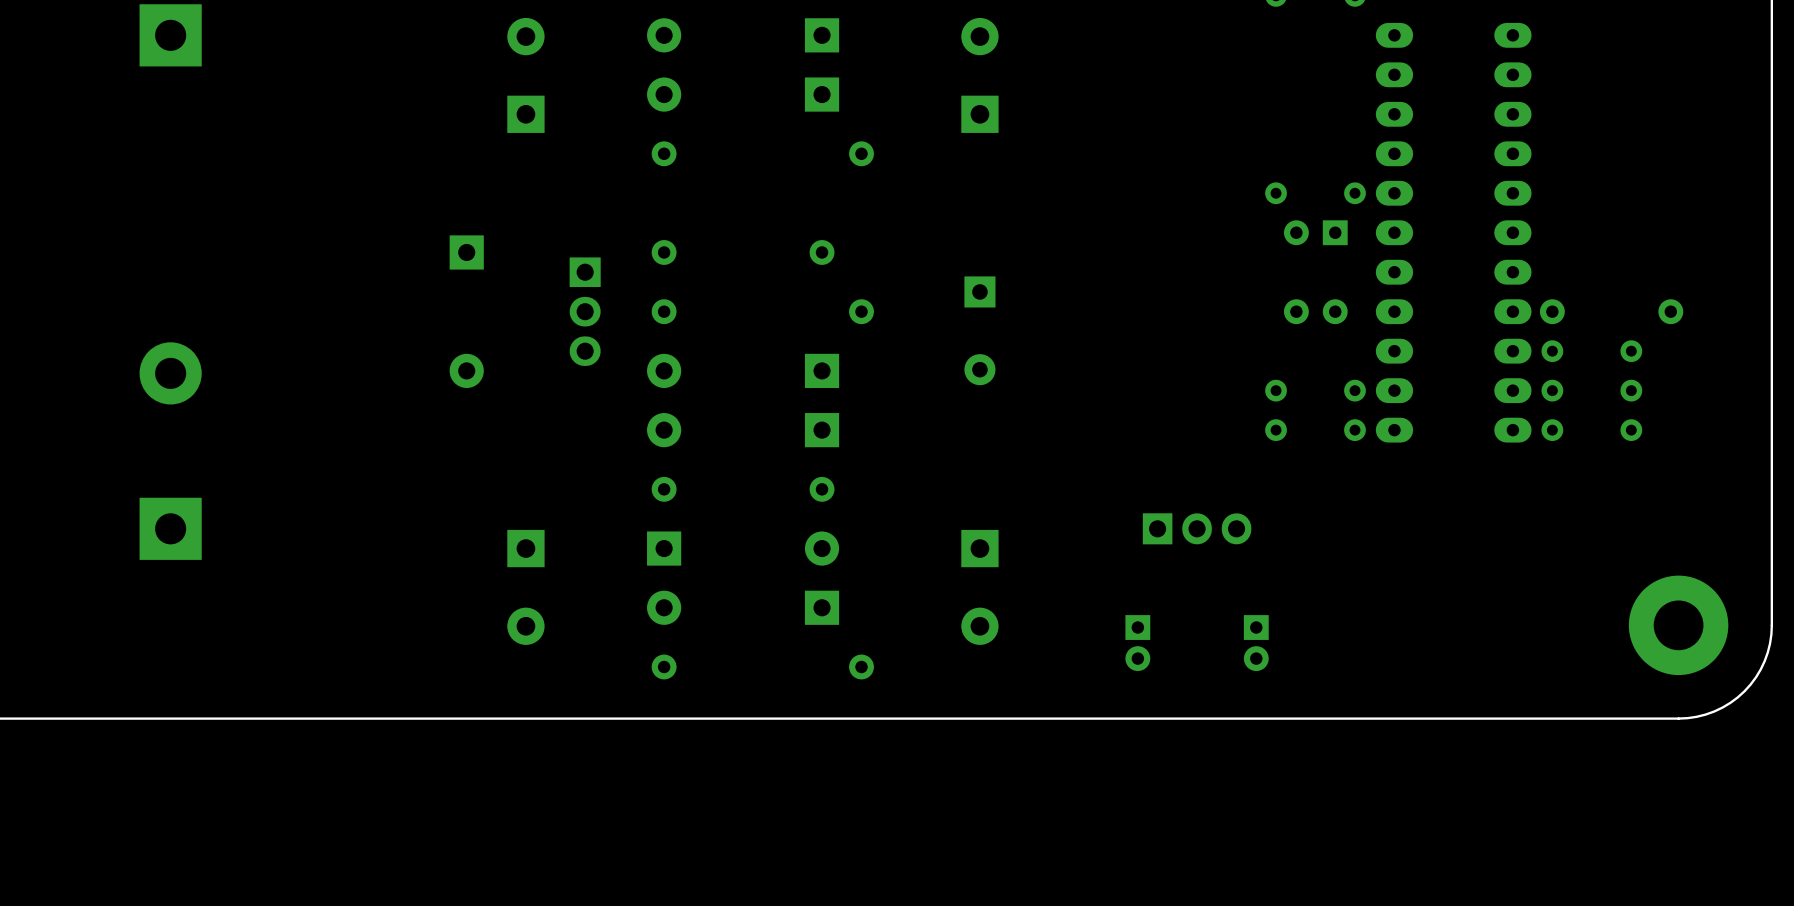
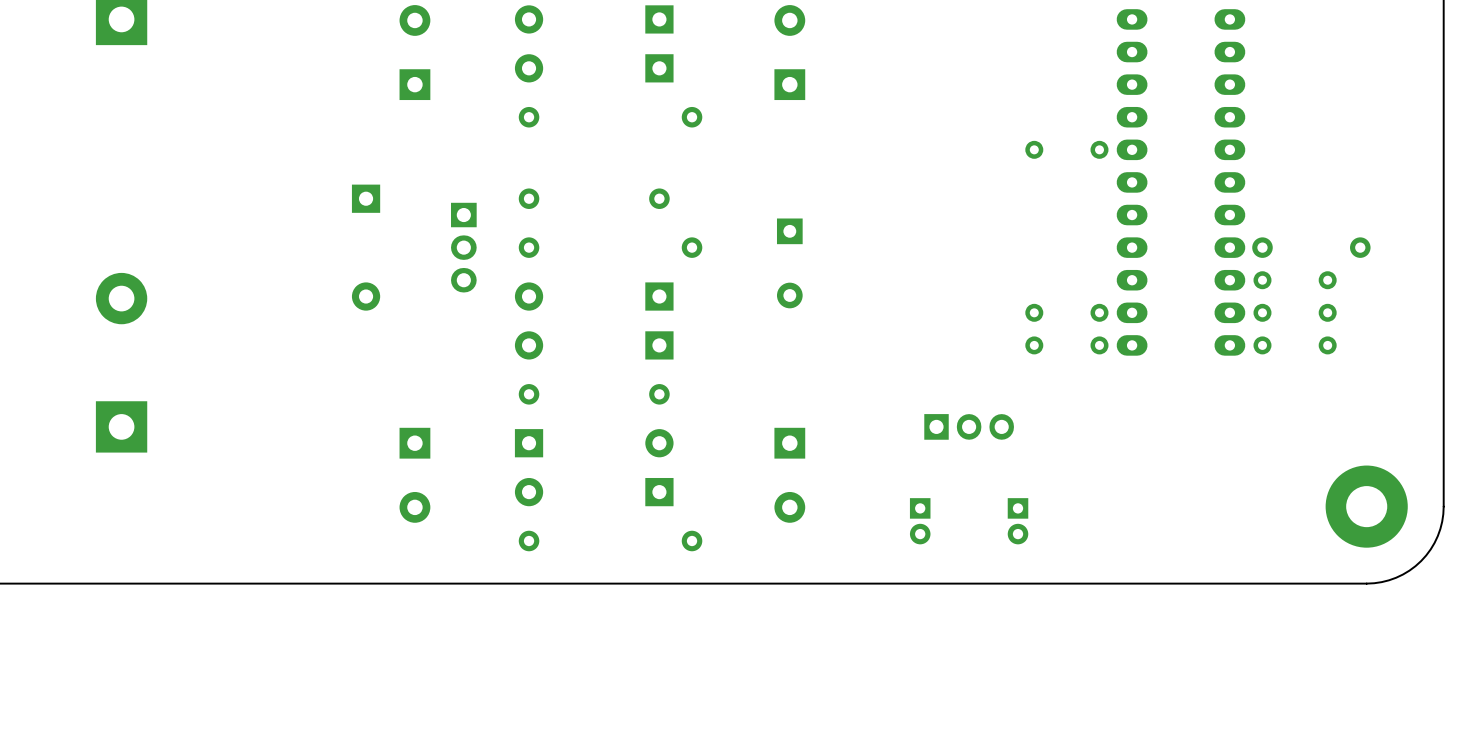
part: (1315, 232) -> none
part: (1315, 311) -> none

